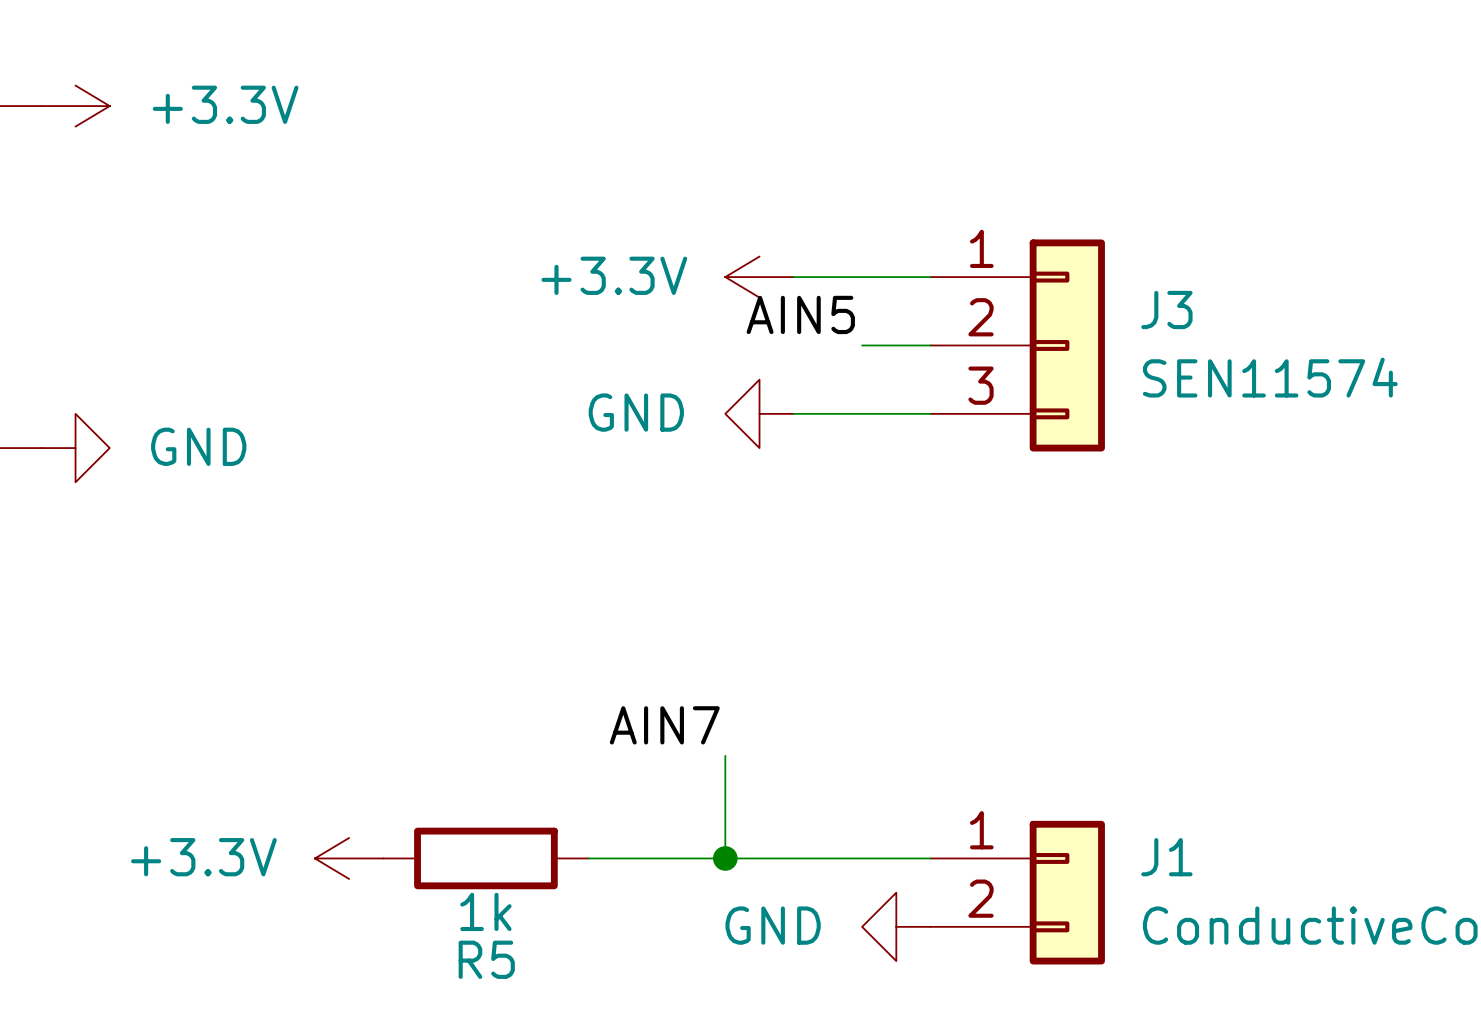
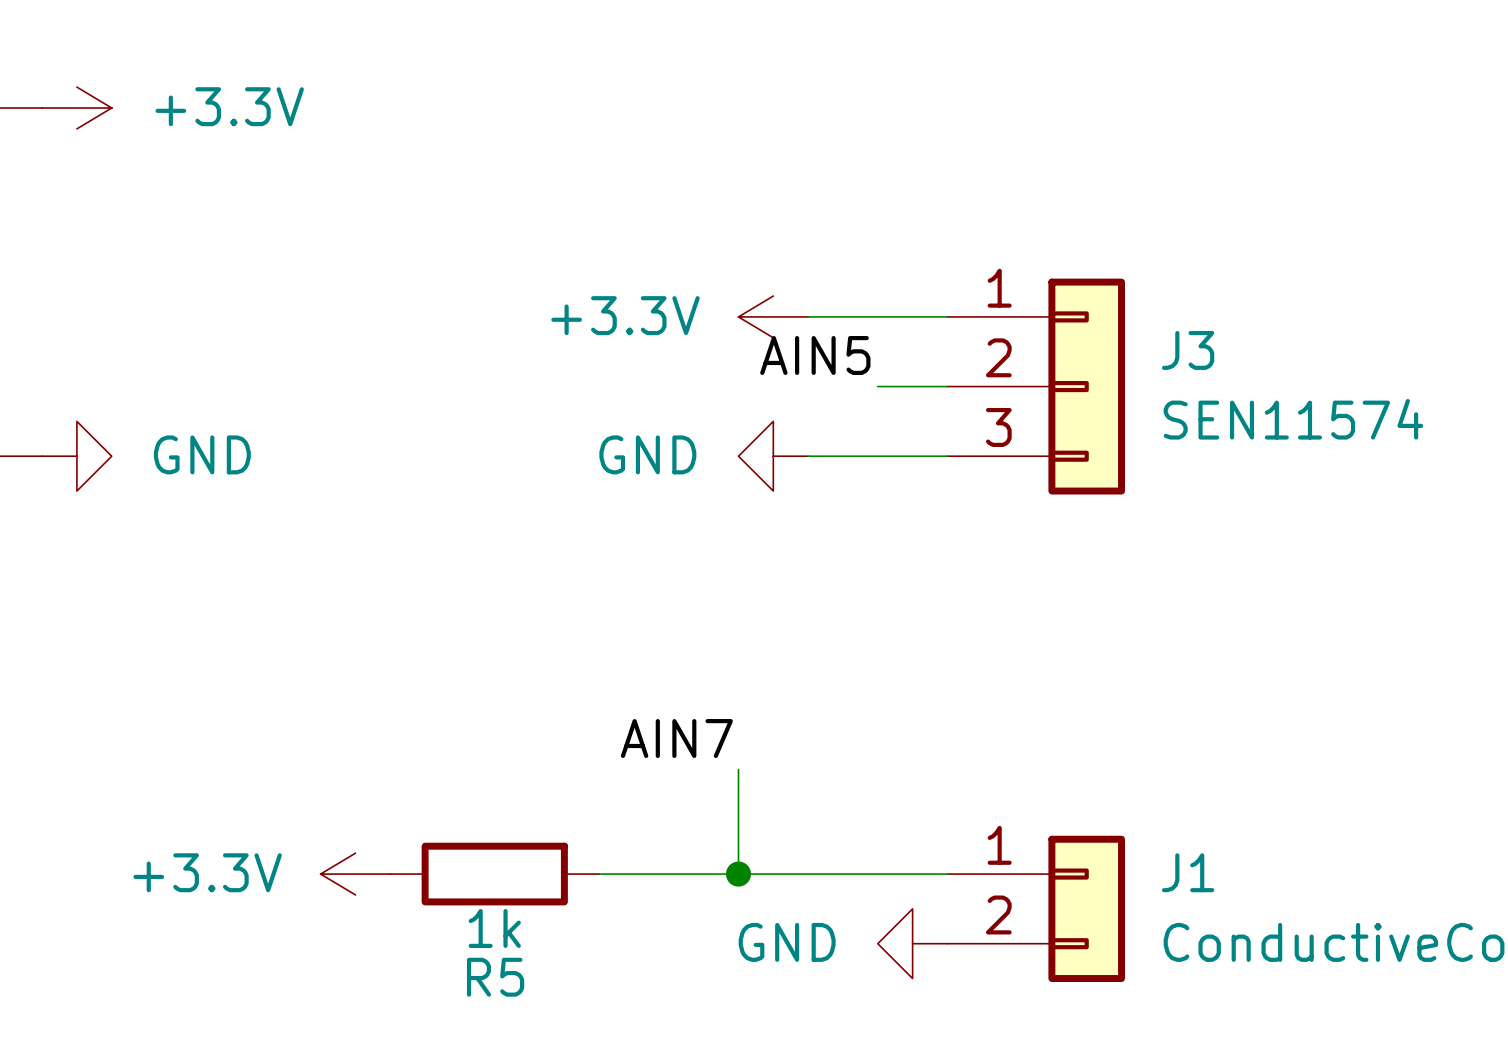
power symbol position: +3.3V (759, 277) -> +3.3V (773, 316)
wire: (793, 277) (930, 277) -> (808, 316) (947, 316)
label position: AIN5 (800, 314) -> AIN5 (815, 355)
wire: (862, 345) (930, 345) -> (877, 386) (947, 386)
J3 position: (1017, 345) -> (1036, 386)
power symbol position: GND (759, 413) -> GND (773, 456)
wire: (793, 413) (930, 413) -> (808, 456) (947, 456)

